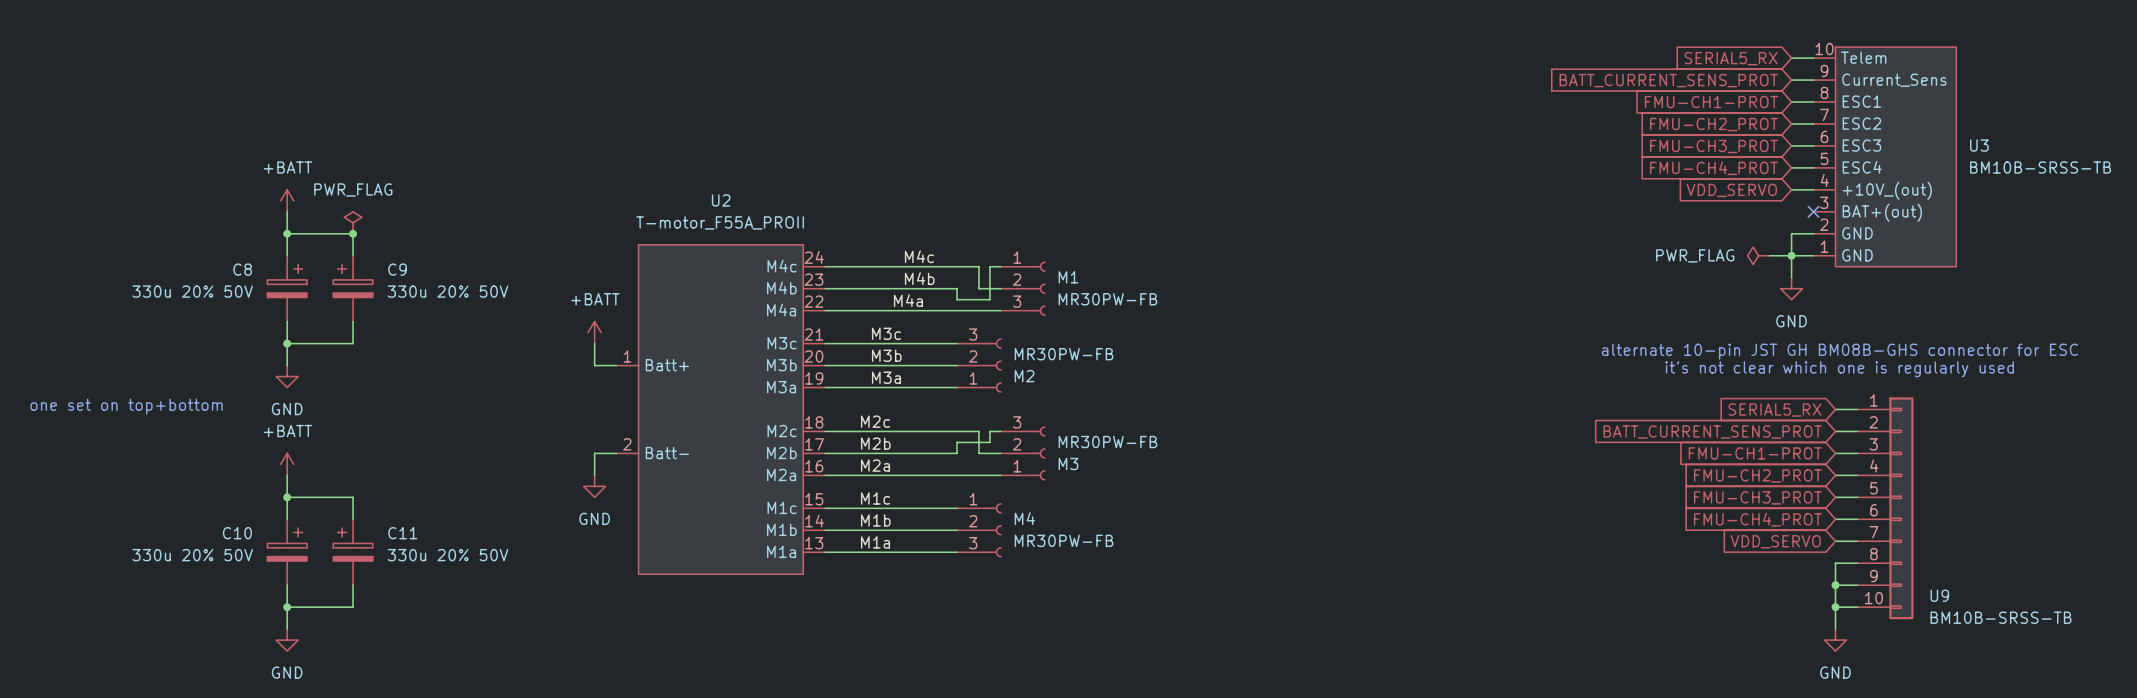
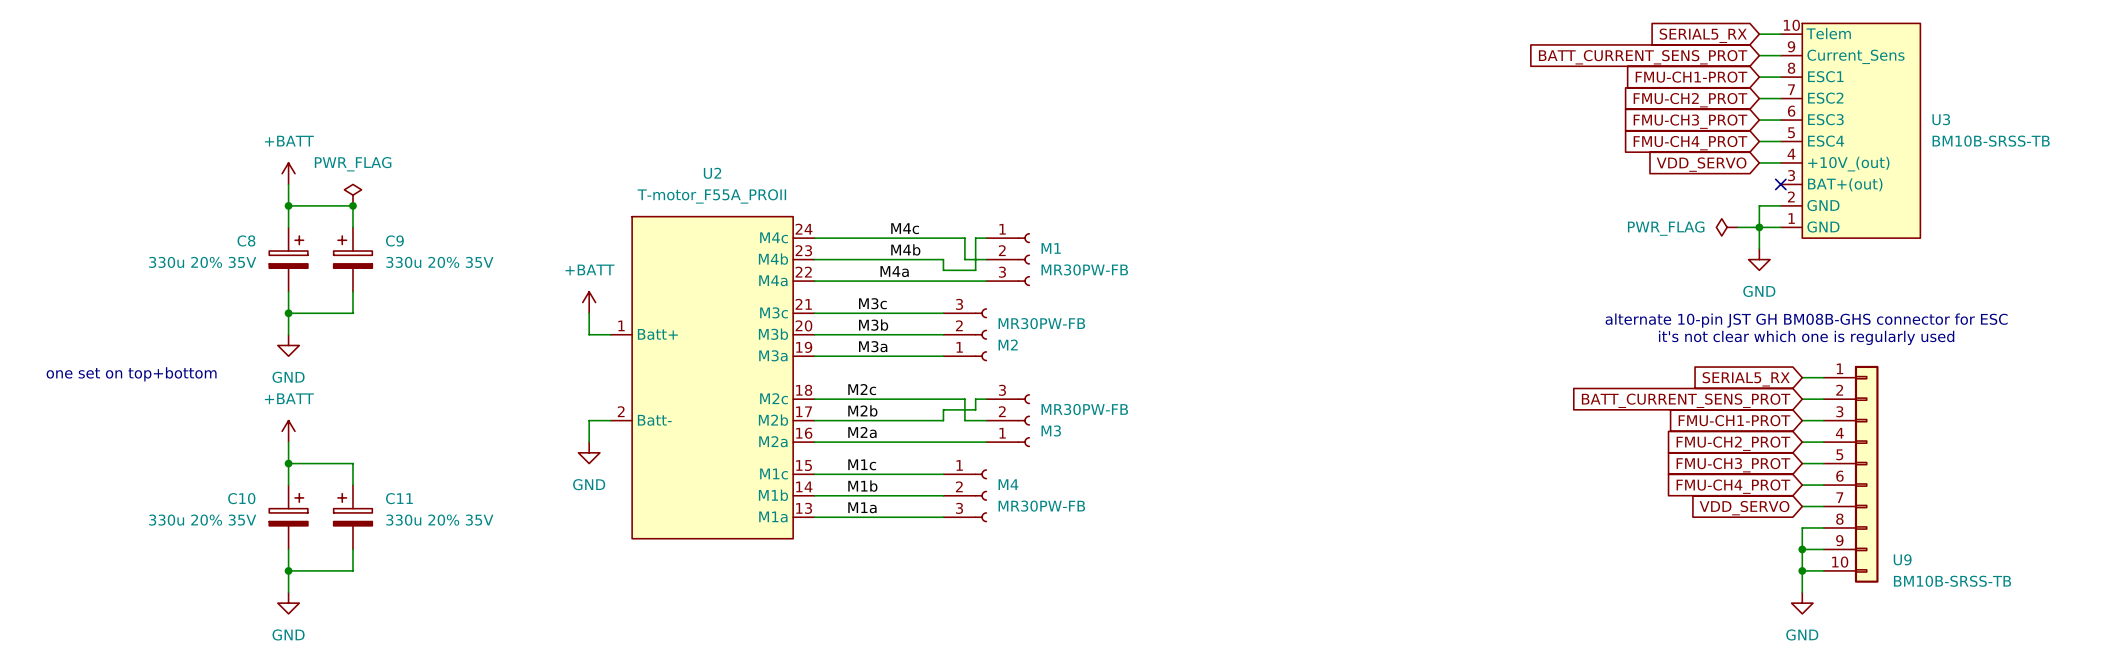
C8 value: 330u 20% 50V (192, 291) -> 330u 20% 35V (202, 262)
C9 value: 330u 20% 50V (448, 291) -> 330u 20% 35V (439, 262)
C10 value: 330u 20% 50V (192, 555) -> 330u 20% 35V (202, 520)
C11 value: 330u 20% 50V (448, 555) -> 330u 20% 35V (439, 520)

